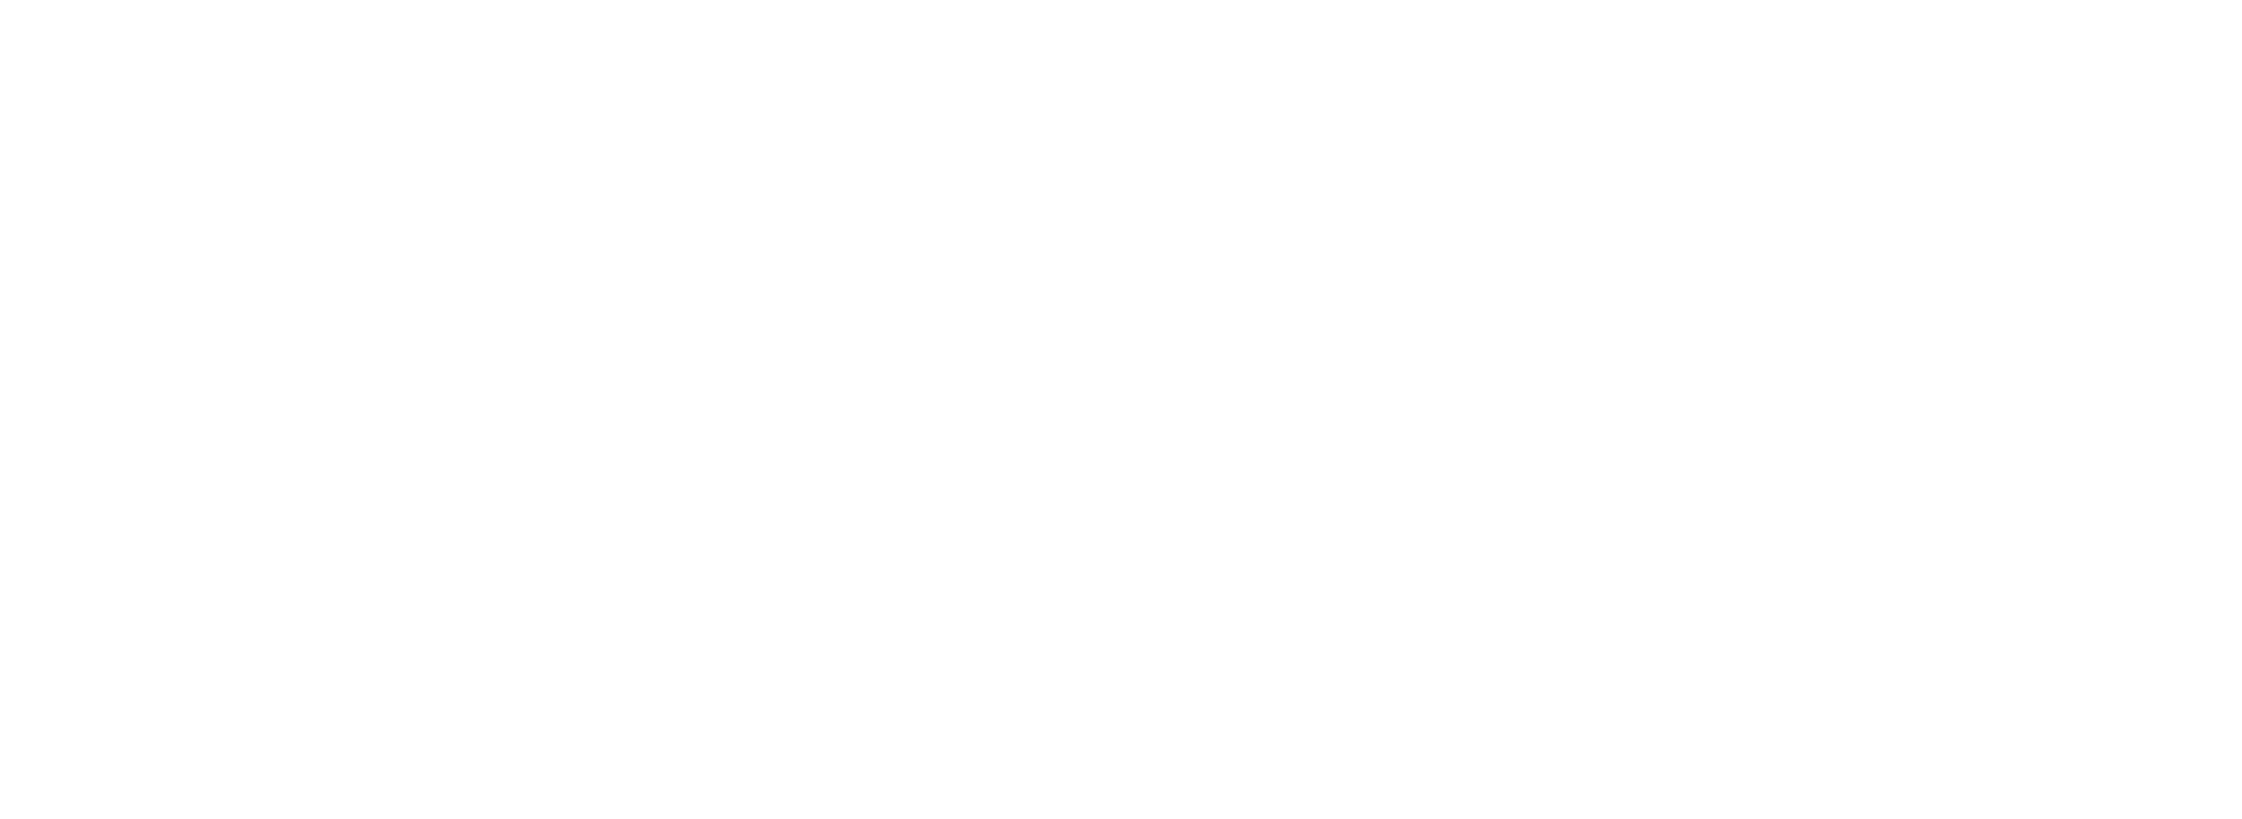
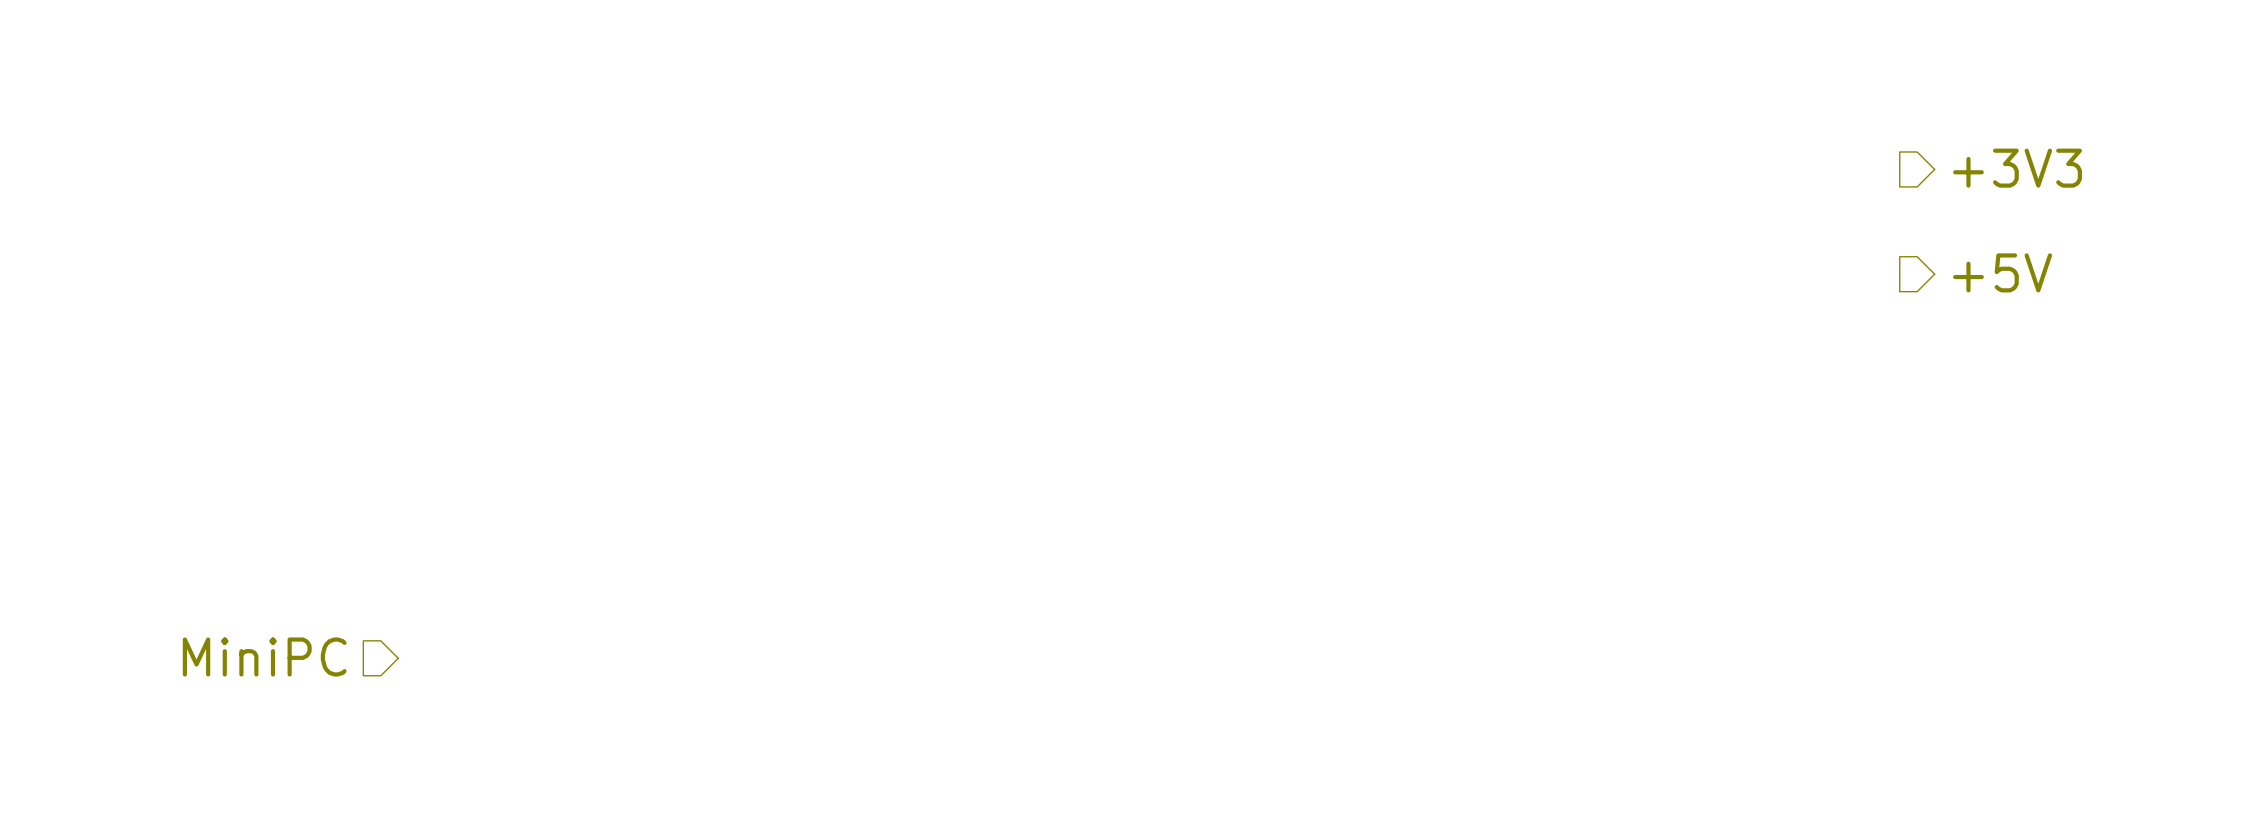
hierarchical label: none -> +3V3 (2017, 168)
hierarchical label: none -> +5V (2002, 272)
hierarchical label: none -> MiniPC (264, 657)

